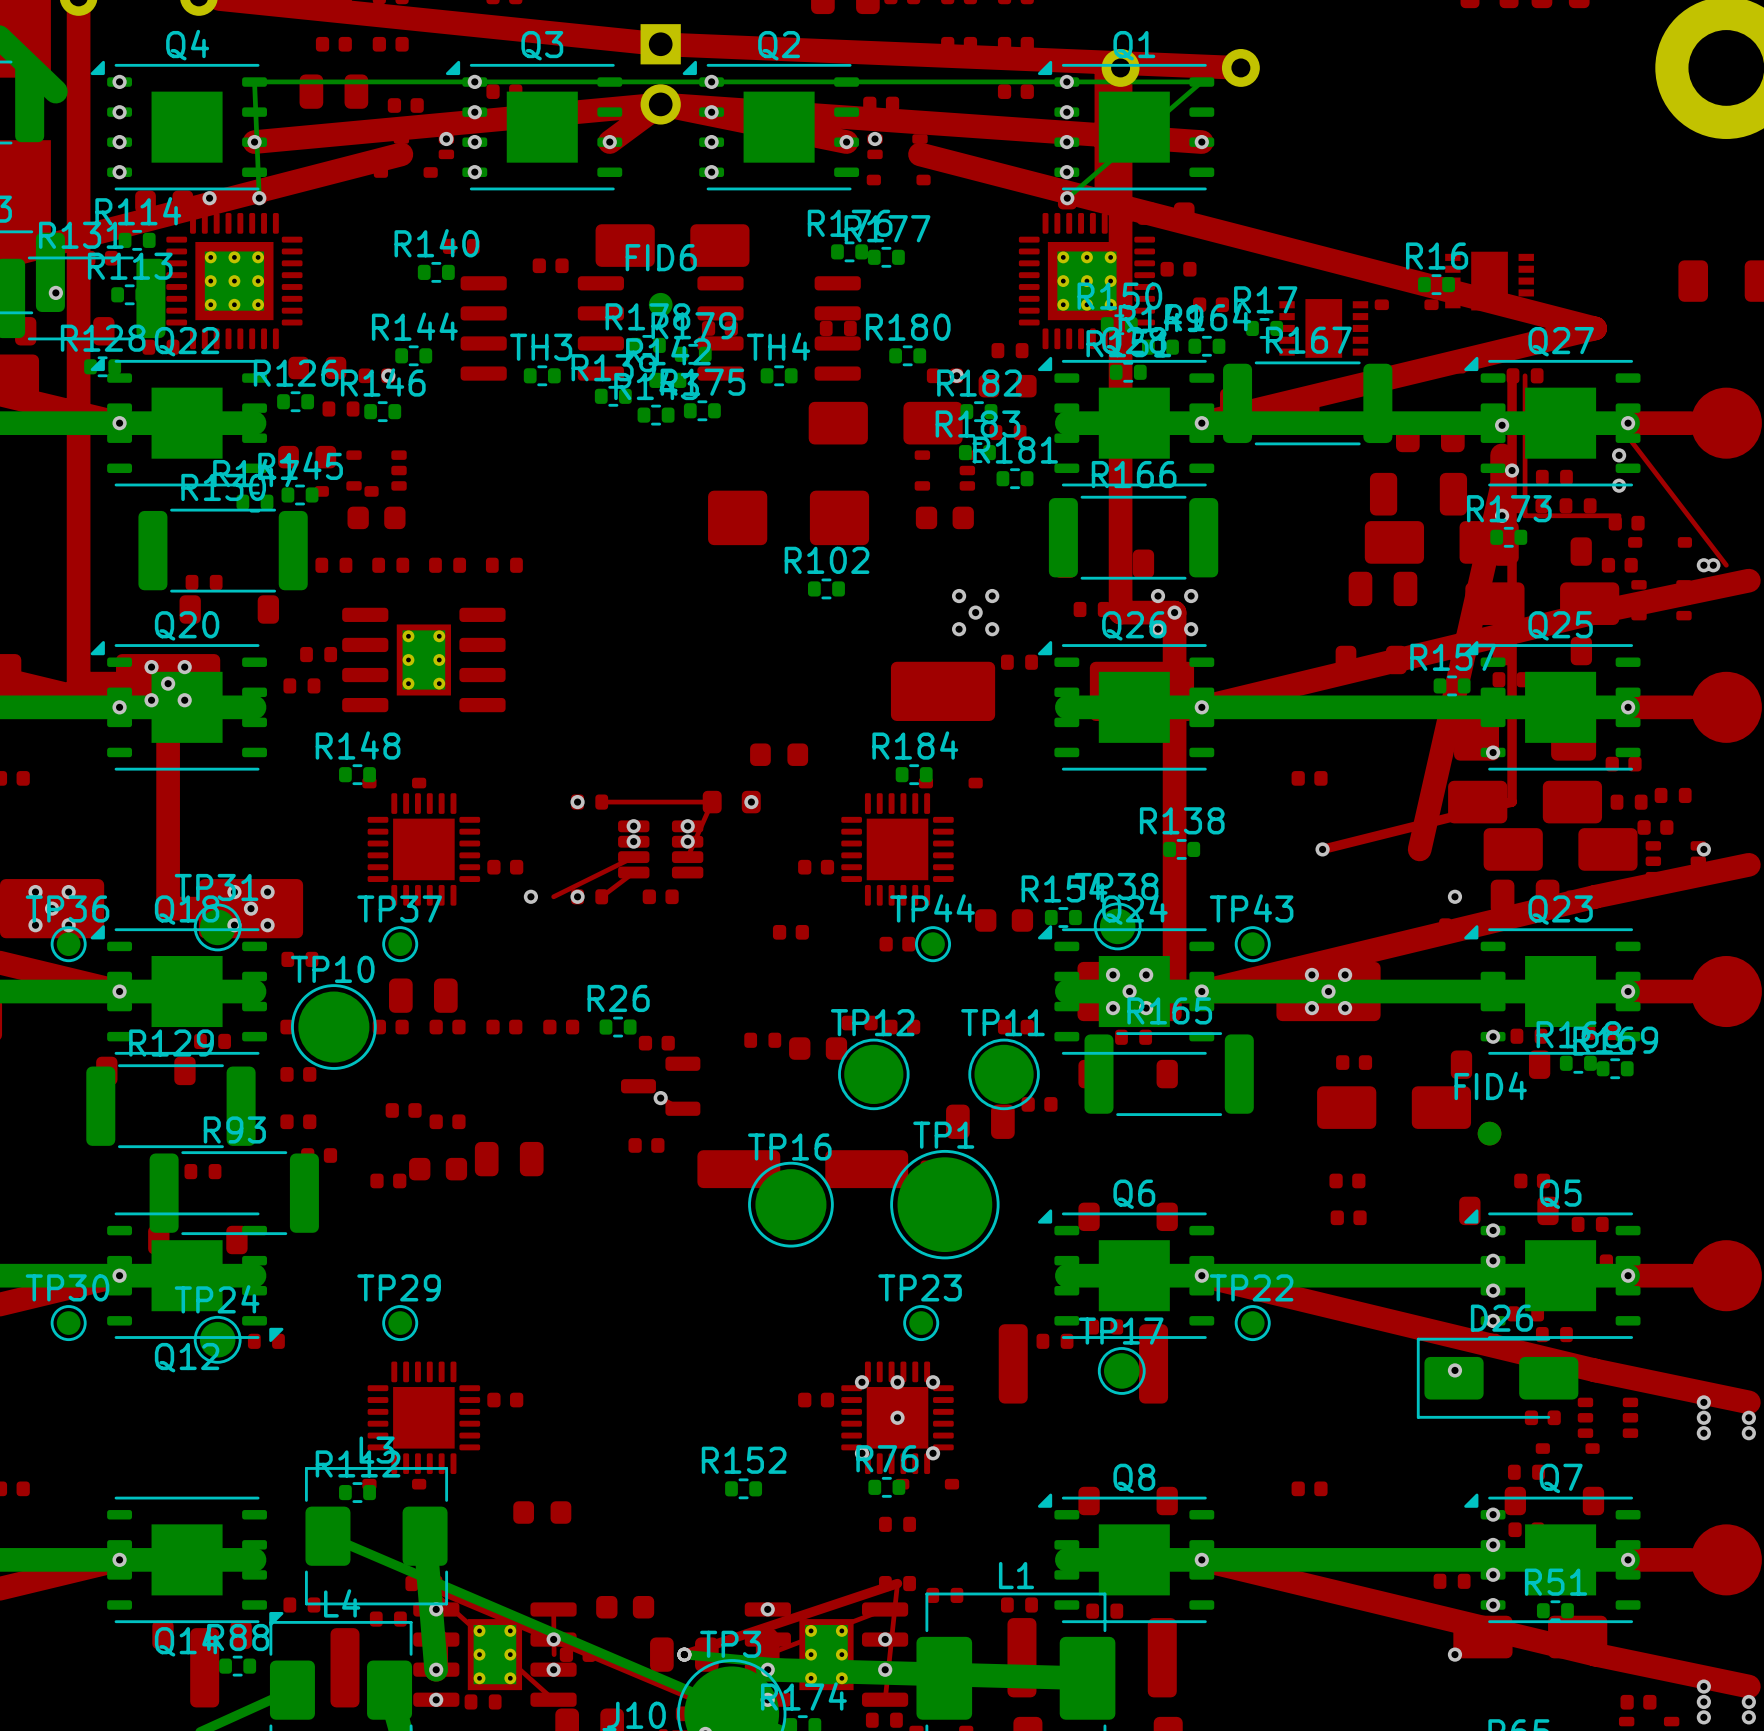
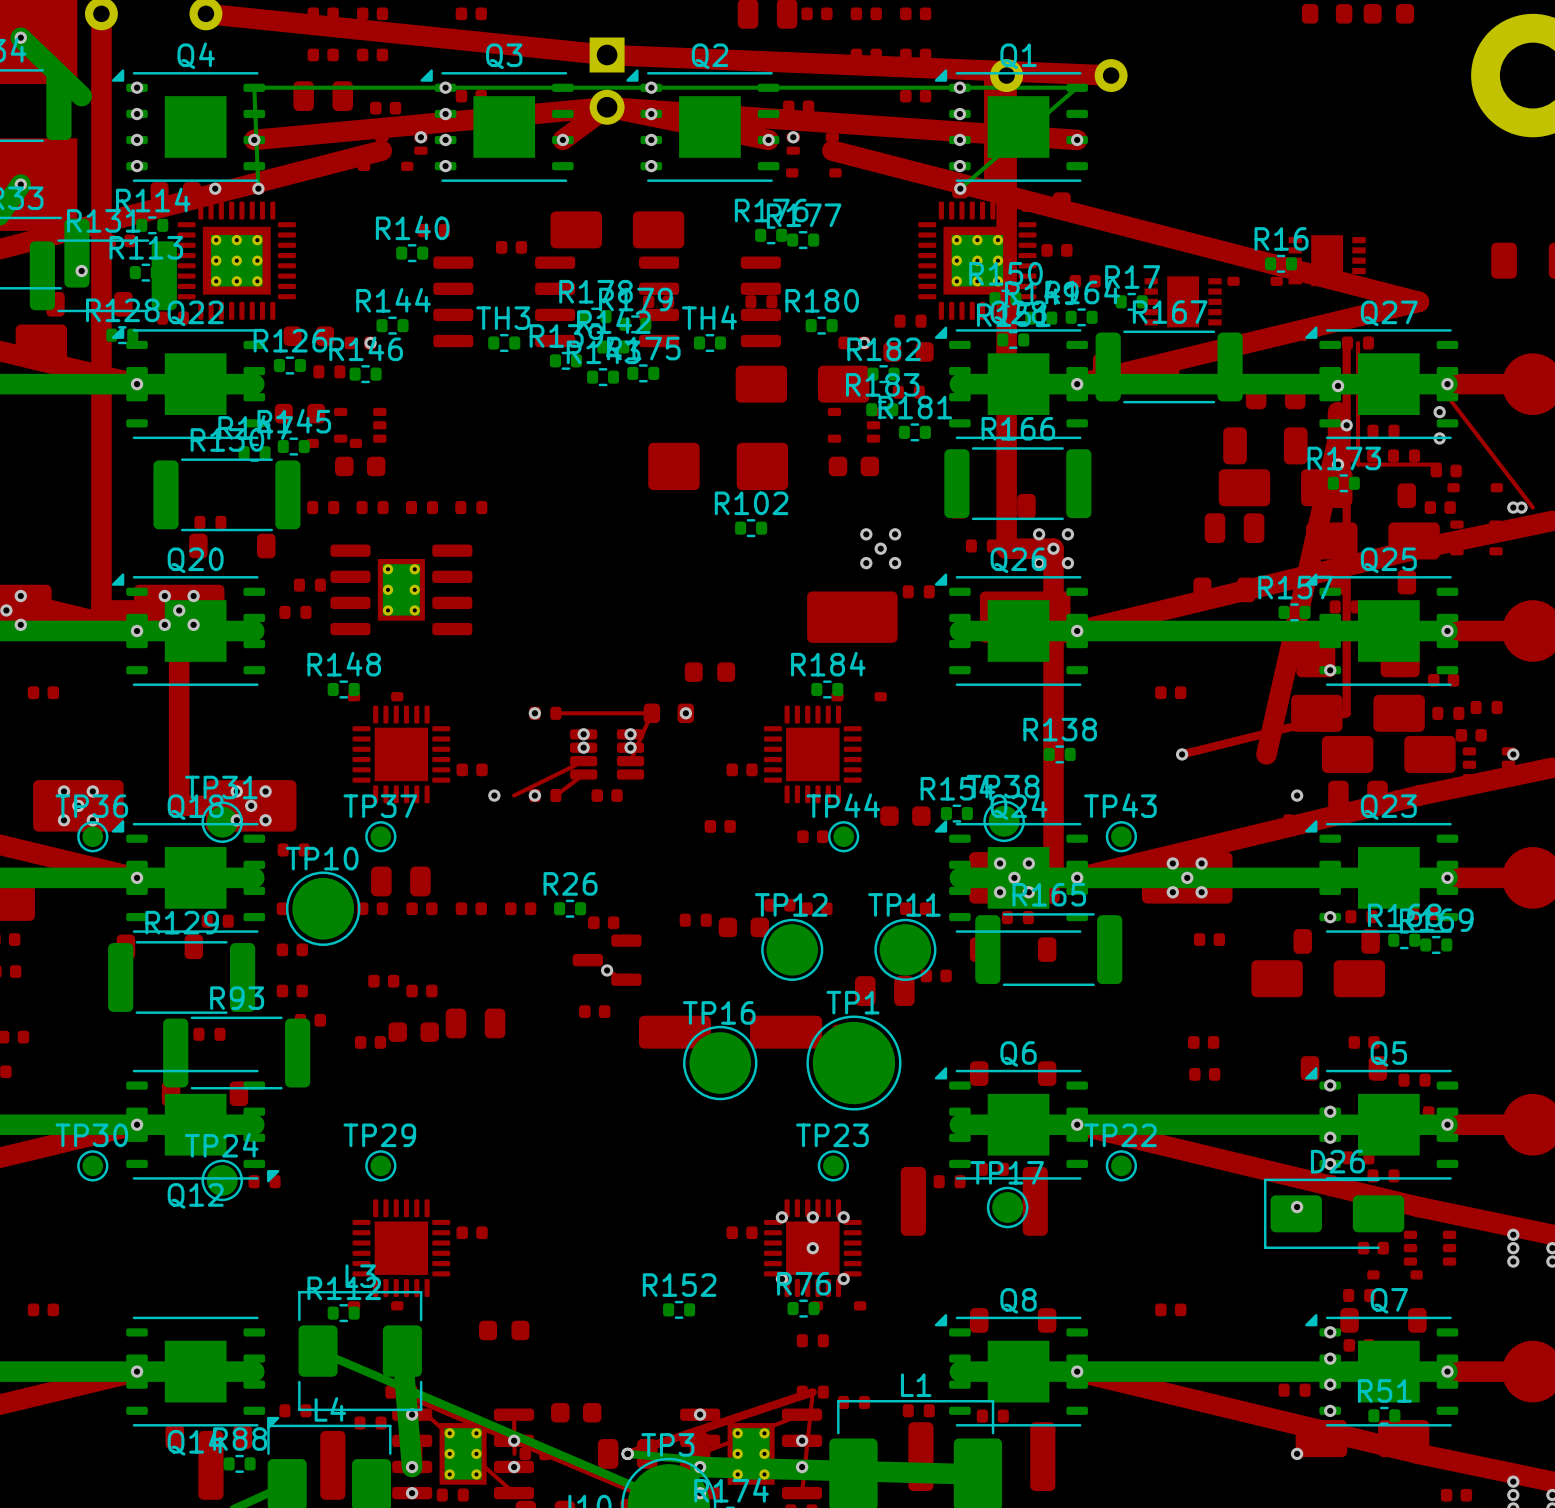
FID6: (660, 304) -> none
part position: (1394, 1107) -> (1318, 978)
FID4: (1489, 1133) -> none

